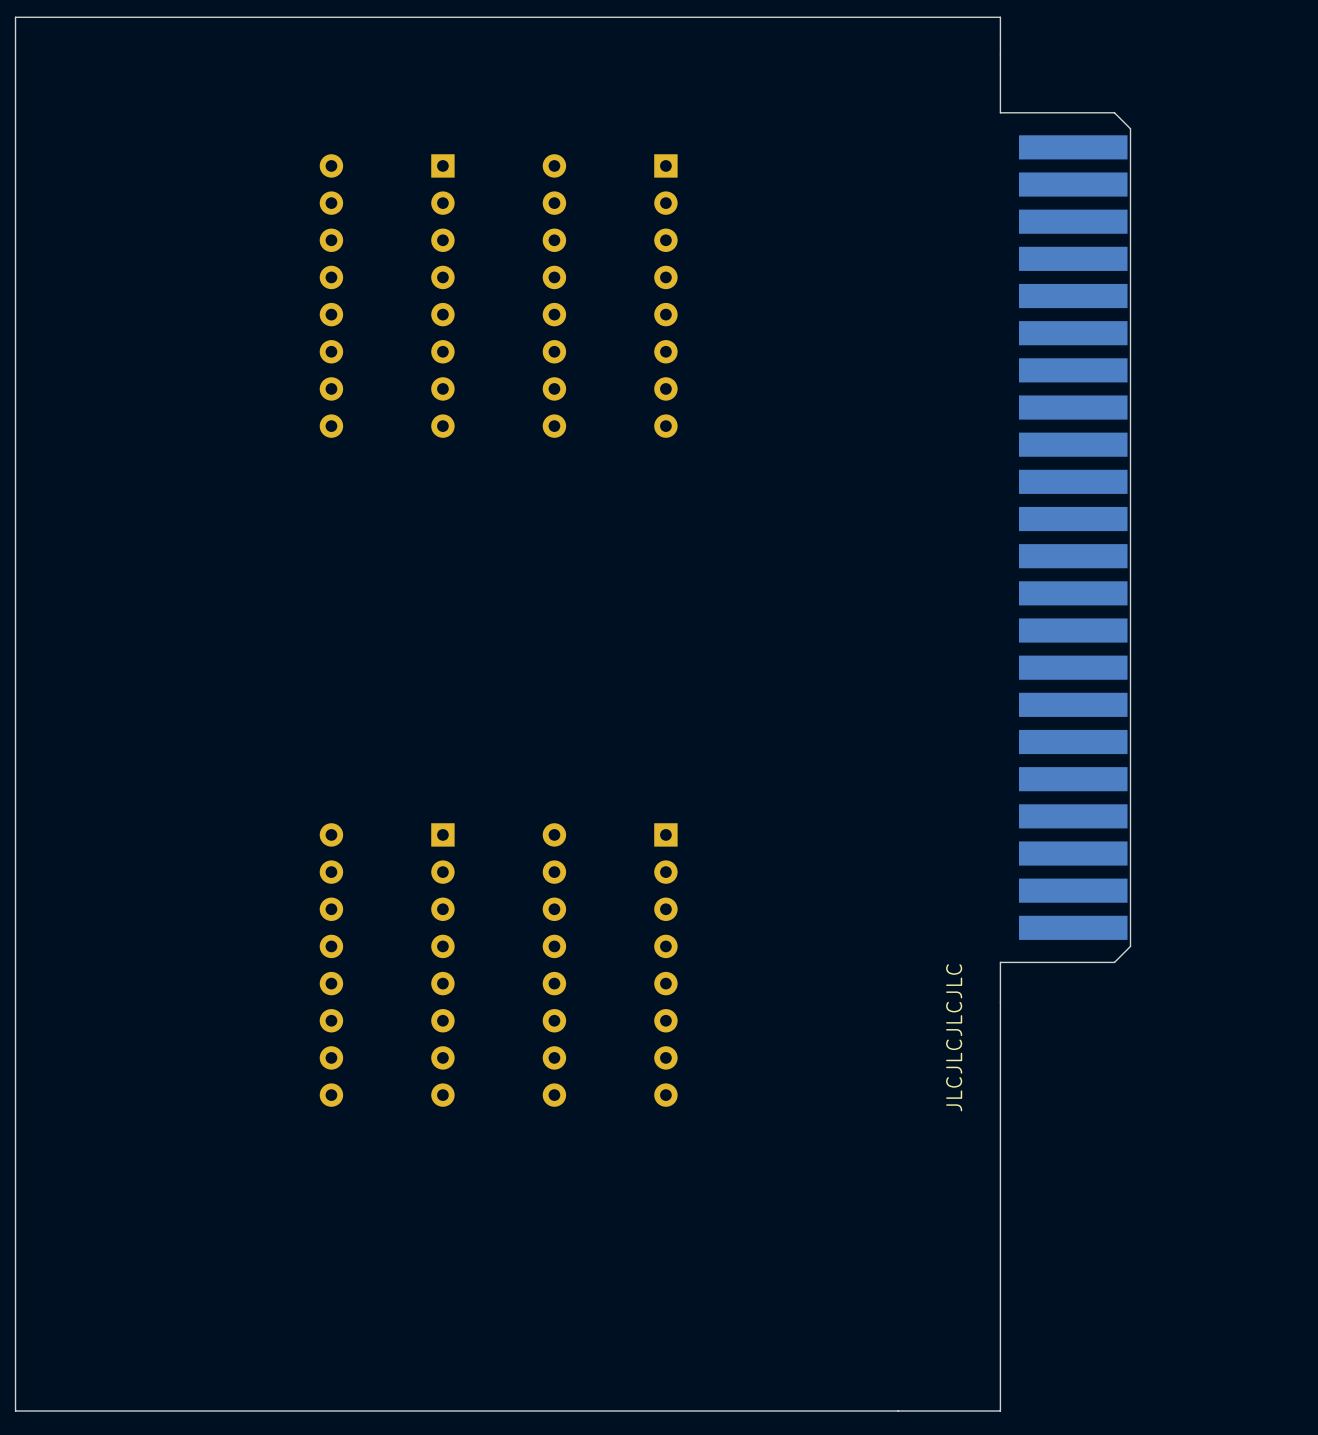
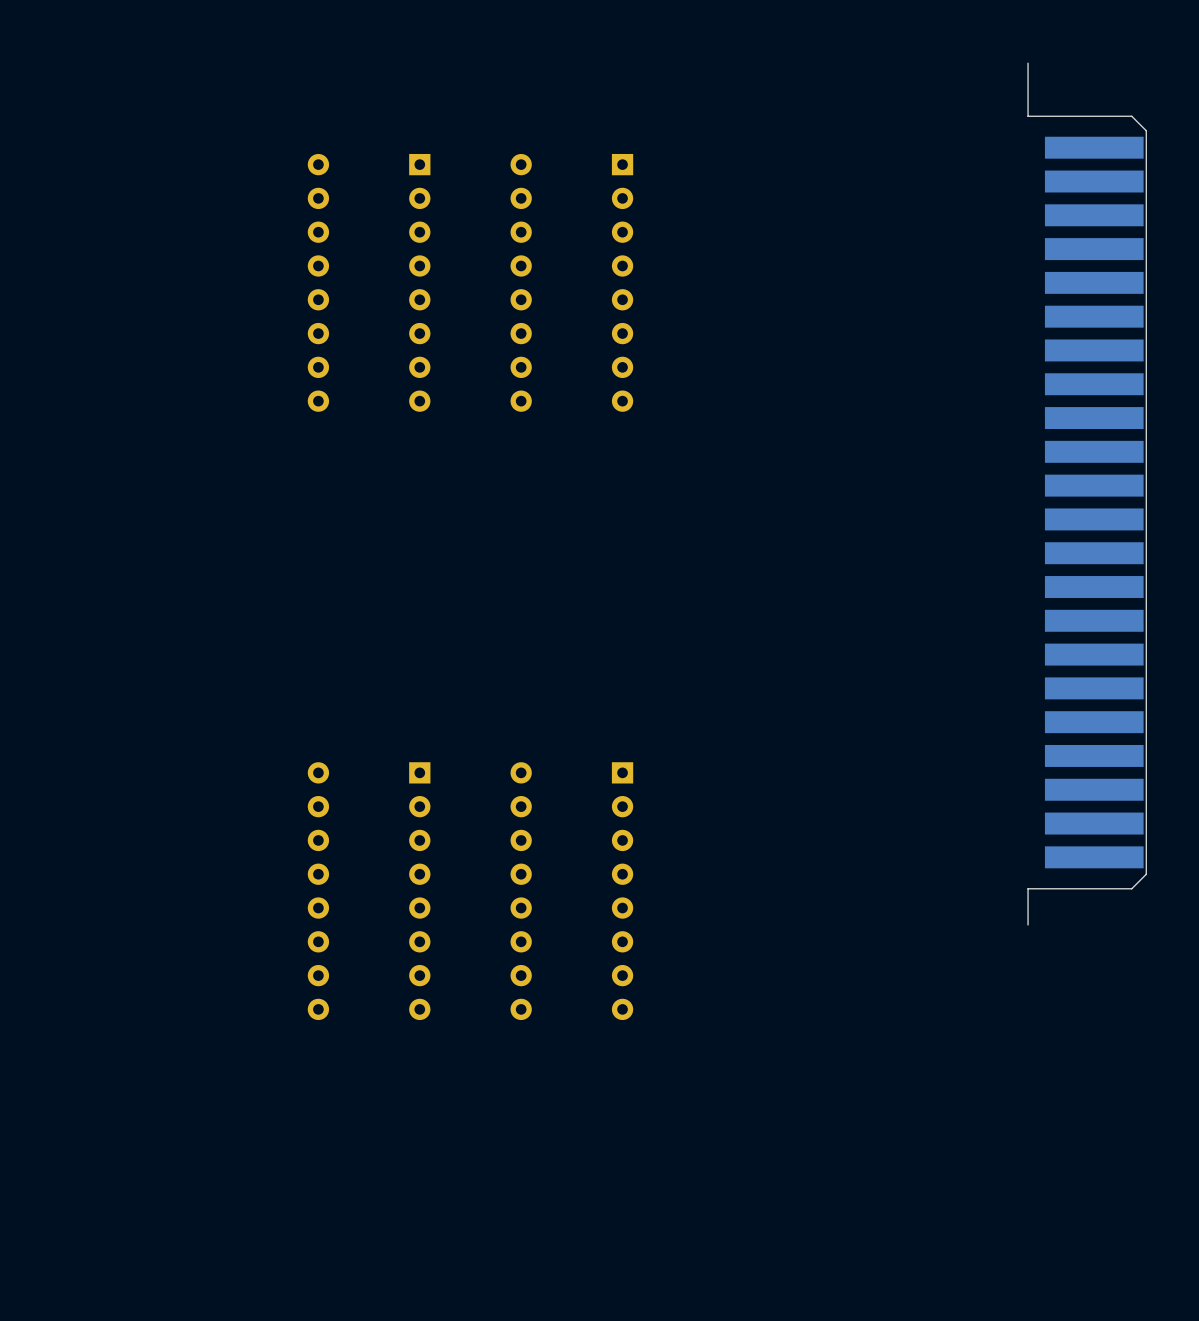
board edge: (1000, 54) (1000, 17) (15, 17) (15, 1411) (1000, 1411) (1000, 1002) -> none
part position: (1065, 528) -> (1087, 494)
text: JLCJLCJLCJLC (954, 1037) -> none

